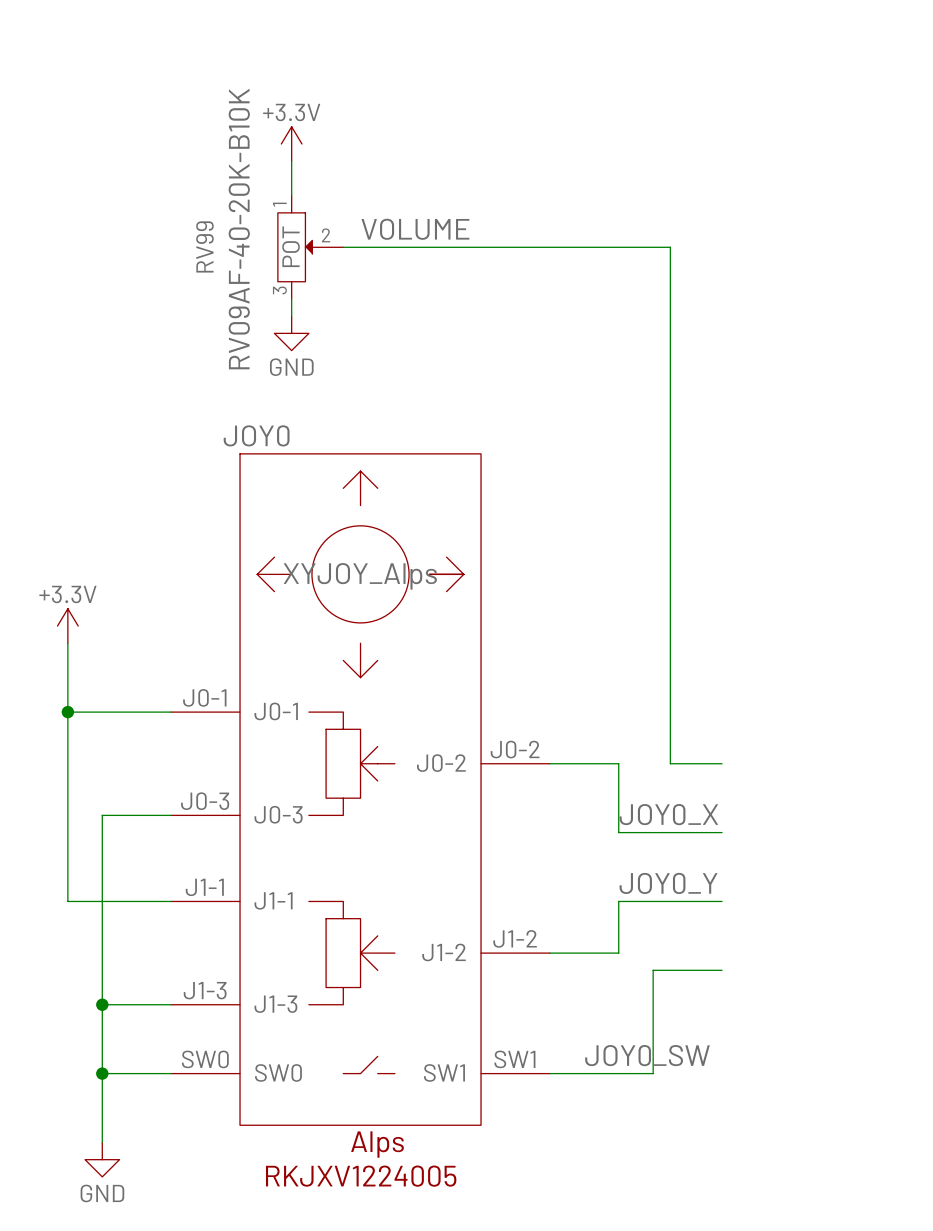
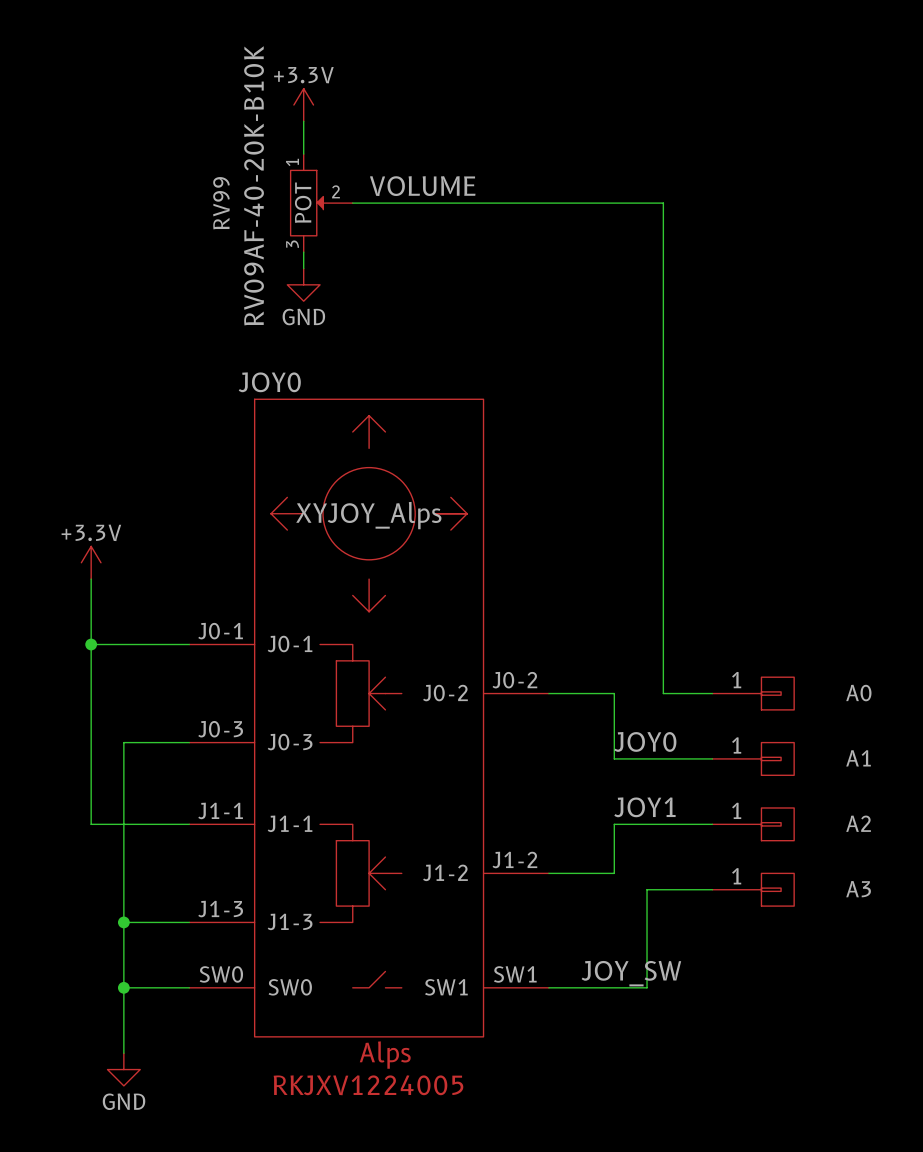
A0: none -> (753, 693)
label: JOY0_X (668, 814) -> JOY0 (645, 741)
A1: none -> (753, 758)
label: JOY0_Y (668, 883) -> JOY1 (644, 807)
A2: none -> (753, 824)
A3: none -> (753, 889)
label: JOY0_SW (647, 1055) -> JOY_SW (631, 973)

